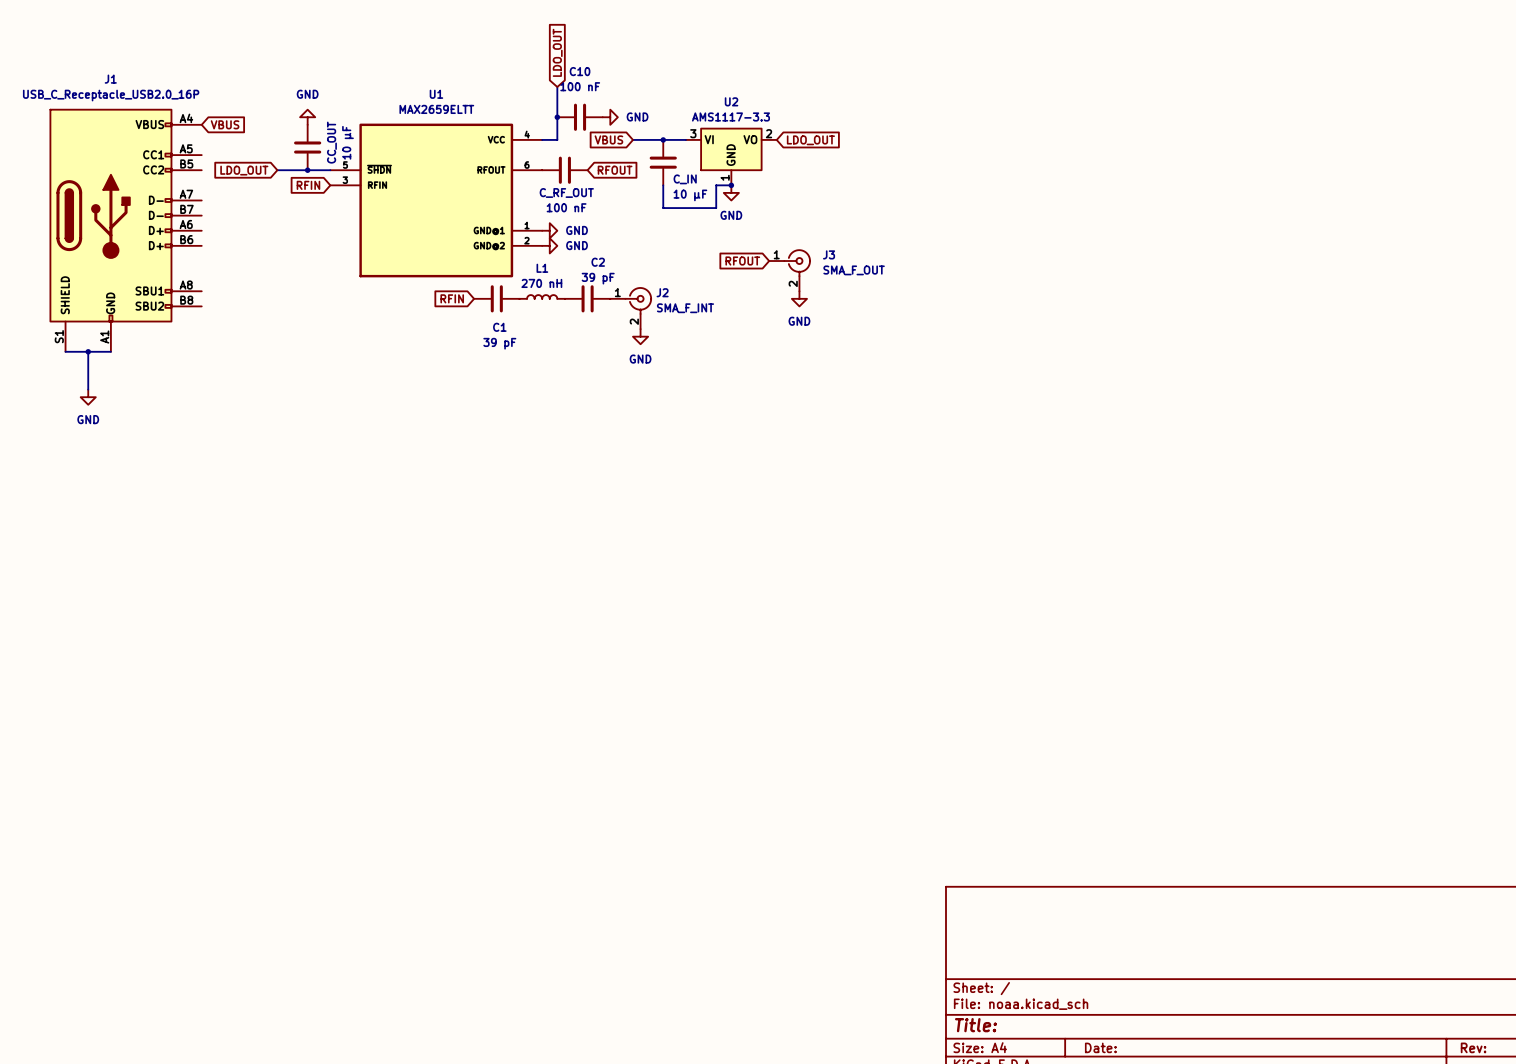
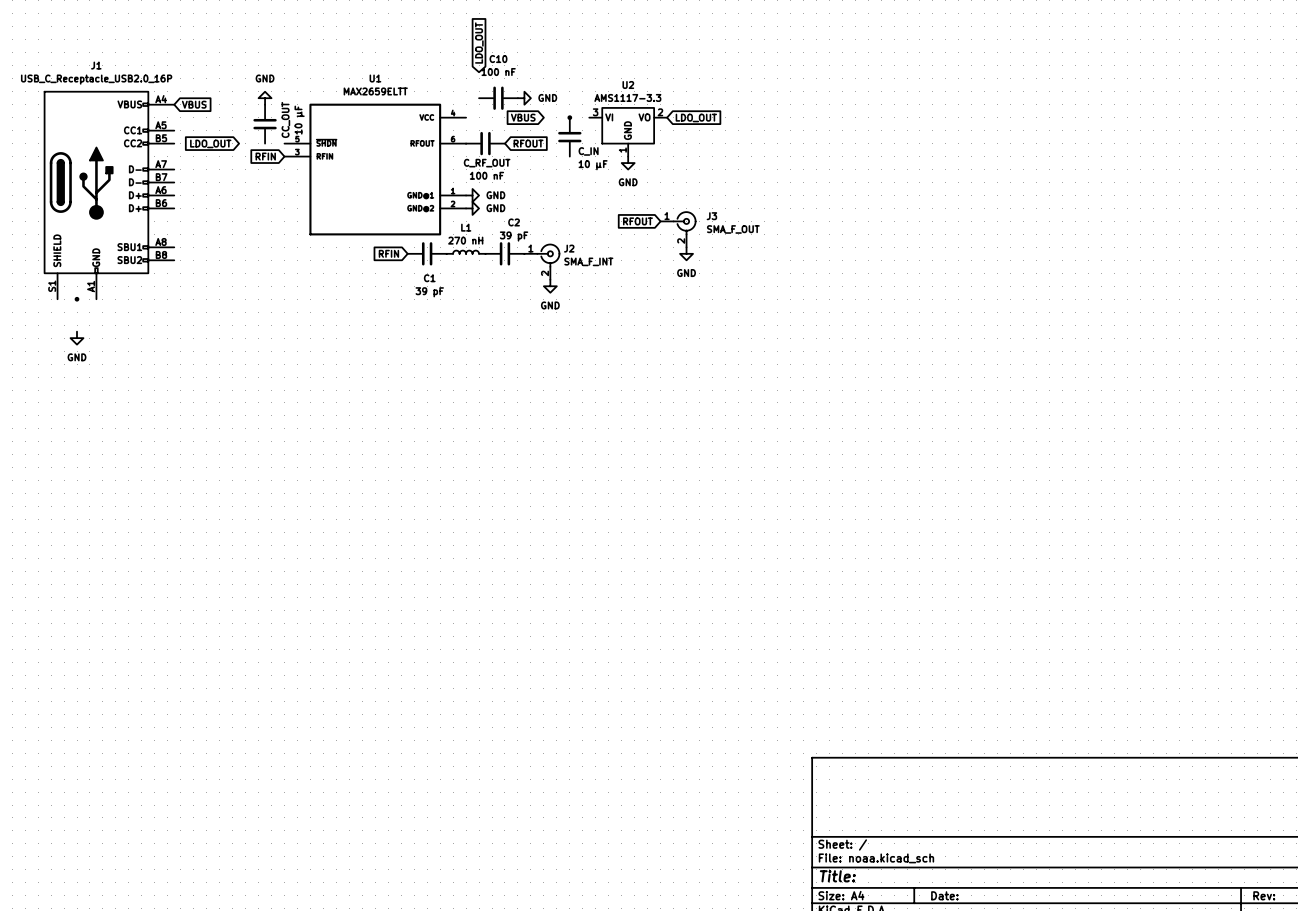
wire: (557, 86) (557, 139) (542, 139) -> none
junction: (557, 117) -> none
wire: (632, 139) (685, 139) -> none
wire: (277, 170) (330, 170) -> none
junction: (307, 170) -> none
wire: (663, 185) (663, 208) (716, 208) (716, 185) (731, 185) -> none
junction: (731, 185) -> none
wire: (65, 351) (110, 351) -> none
wire: (88, 351) (88, 389) -> none

